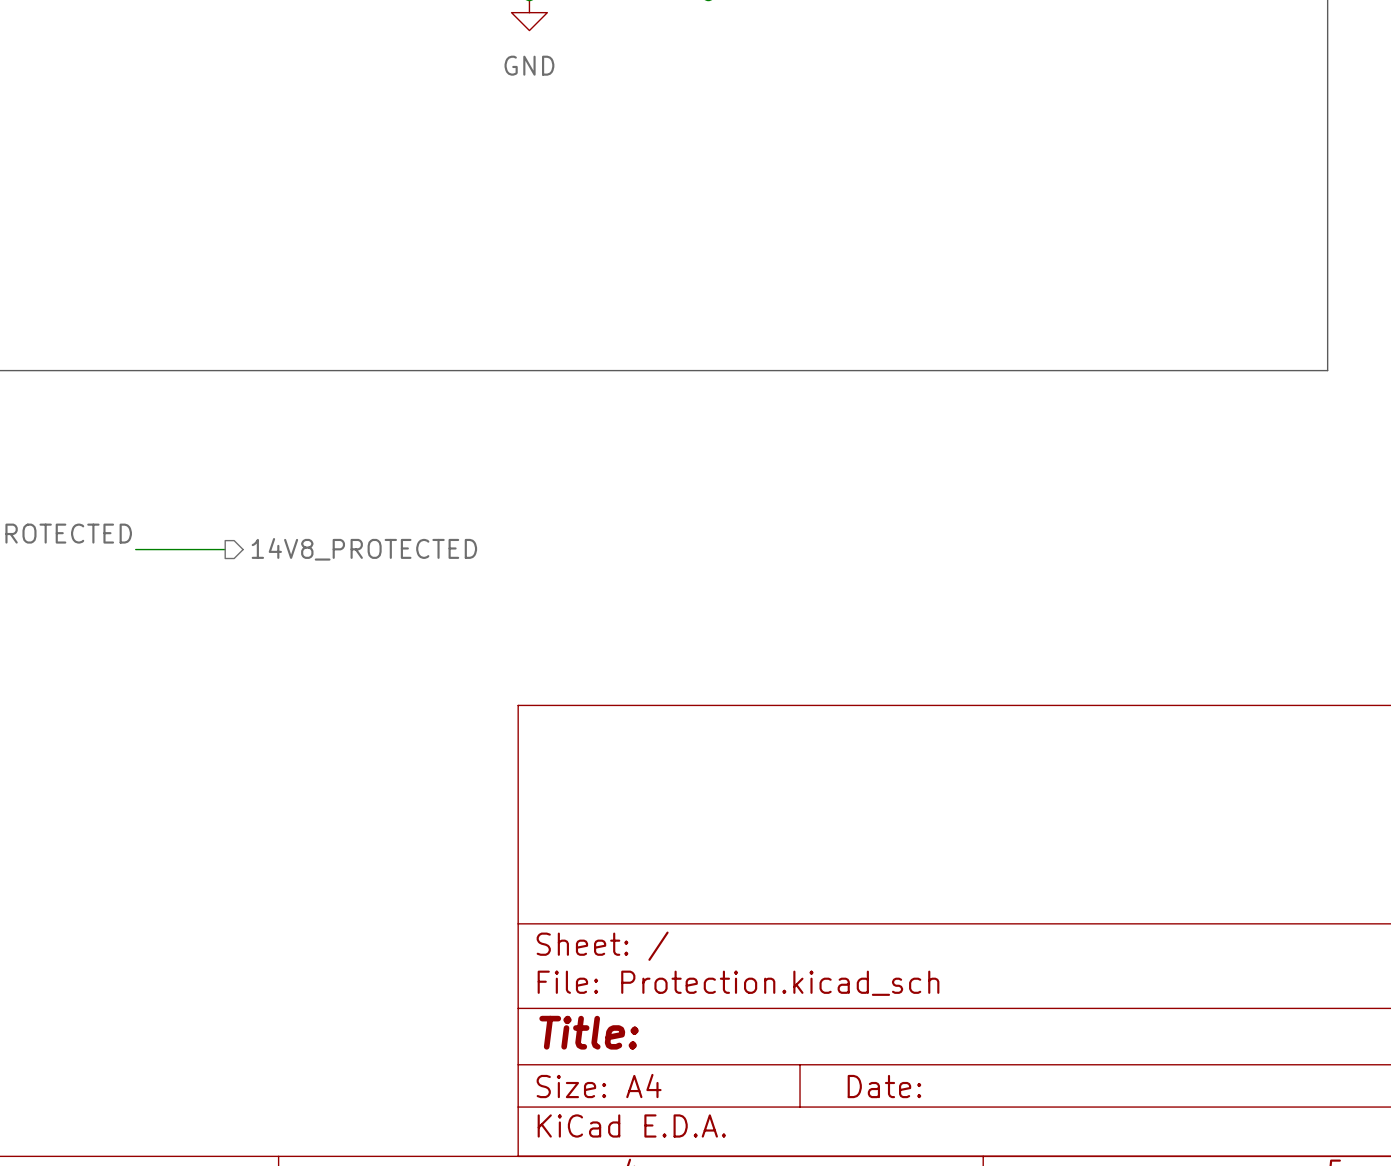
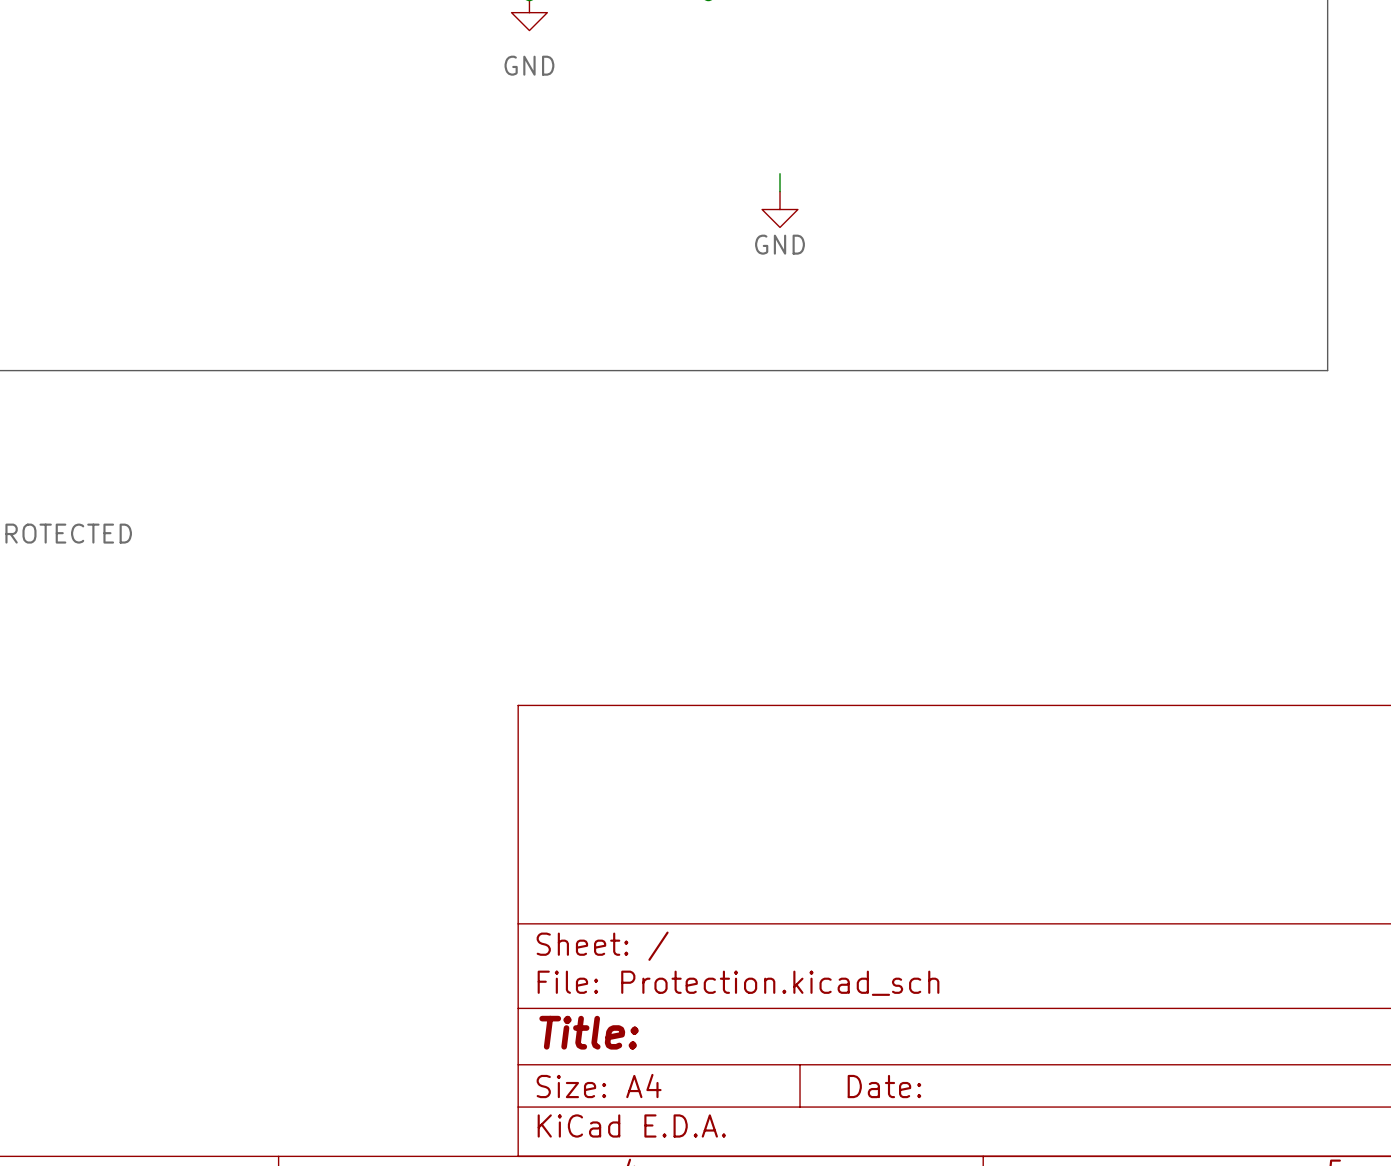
wire: none -> (780, 173) (780, 191)
power symbol: none -> GND (780, 209)
wire: (135, 549) (225, 549) -> none
hierarchical label: 14V8_PROTECTED (364, 549) -> none

